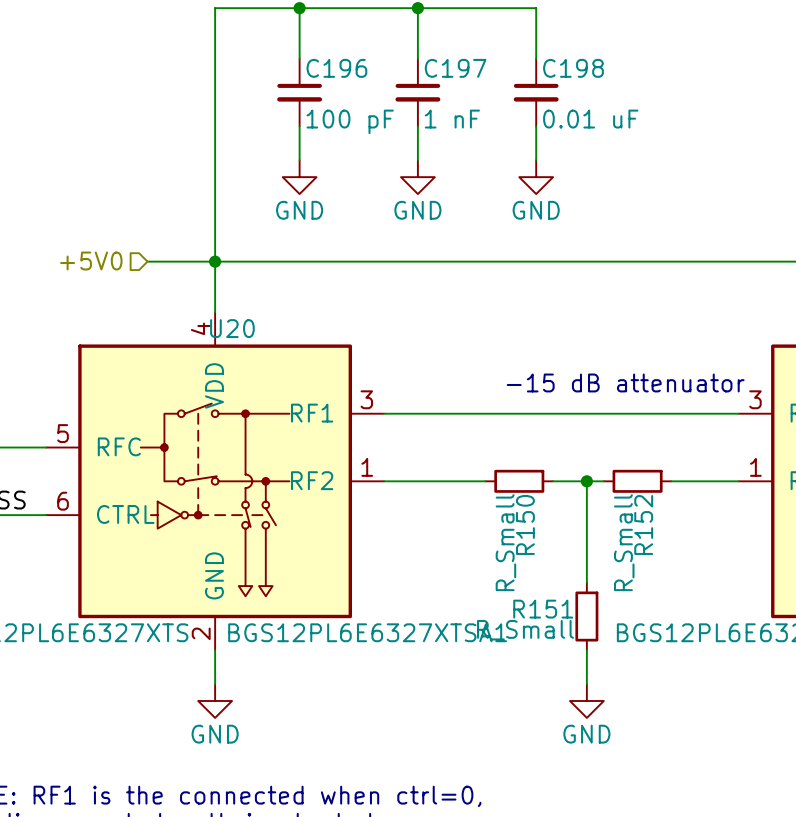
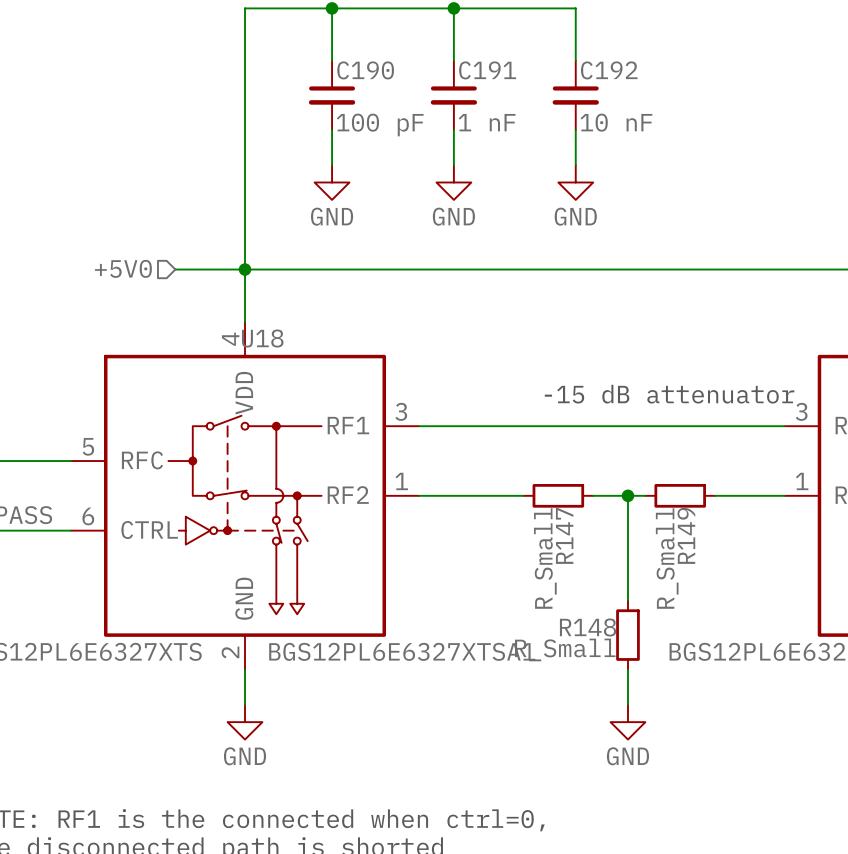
C196 name: C196 (336, 68) -> C190 (365, 70)
C197 name: C197 (455, 68) -> C191 (487, 70)
C198 name: C198 (573, 68) -> C192 (609, 70)
C198 value: 0.01 uF (590, 119) -> 10 nF (616, 122)
U20 name: U20 (232, 328) -> U18 (262, 338)
R150 name: R150 (525, 524) -> R147 (564, 535)
R152 name: R152 (643, 524) -> R149 (686, 535)
R151 name: R151 (543, 609) -> R148 (588, 627)

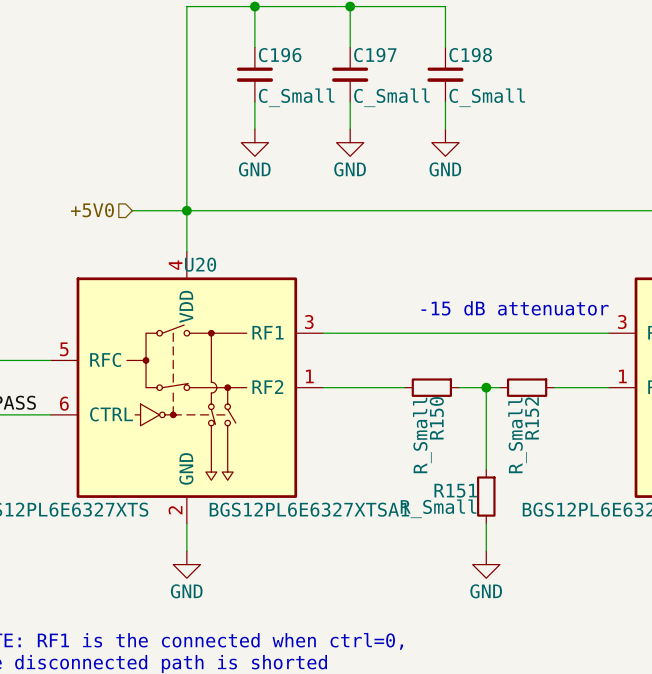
C190 name: C190 (365, 70) -> C196 (280, 55)
C191 name: C191 (487, 70) -> C197 (375, 55)
C192 name: C192 (609, 70) -> C198 (470, 55)
C191 value: 1 nF (487, 122) -> C_Small (391, 97)
C192 value: 10 nF (616, 122) -> C_Small (487, 97)
C190 value: 100 pF (380, 124) -> C_Small (296, 97)
U18 name: U18 (262, 338) -> U20 (200, 264)
R147 name: R147 (564, 535) -> R150 (436, 418)
R149 name: R149 (686, 535) -> R152 (532, 418)
R148 name: R148 (588, 627) -> R151 (455, 490)

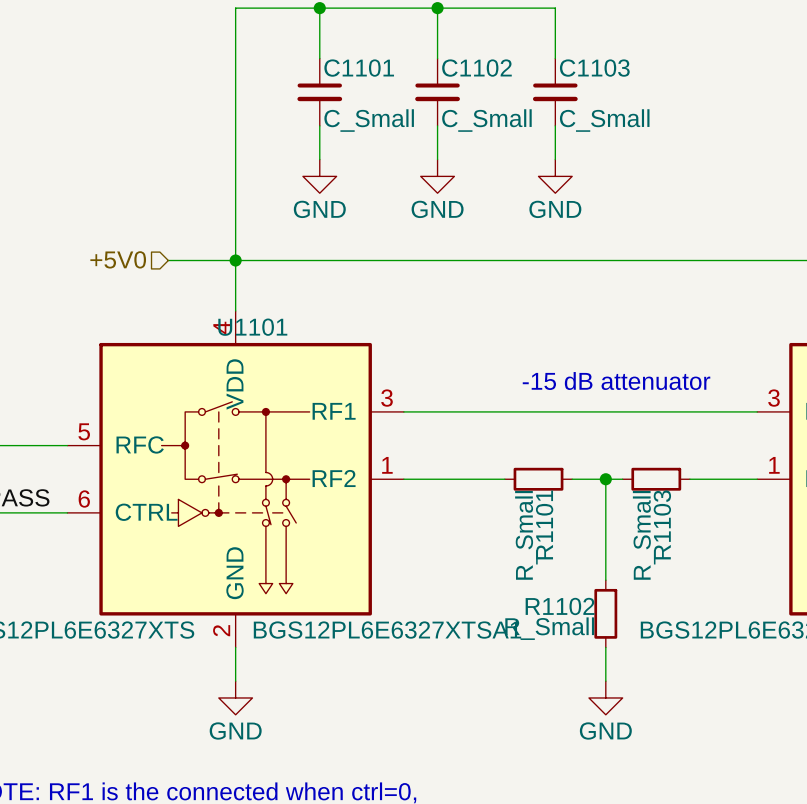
C196 name: C196 (280, 55) -> C1101 (359, 68)
C197 name: C197 (375, 55) -> C1102 (476, 68)
C198 name: C198 (470, 55) -> C1103 (594, 68)
U20 name: U20 (200, 264) -> U1101 (252, 327)
R150 name: R150 (436, 418) -> R1101 (544, 524)
R152 name: R152 (532, 418) -> R1103 (662, 524)
R151 name: R151 (455, 490) -> R1102 (560, 606)

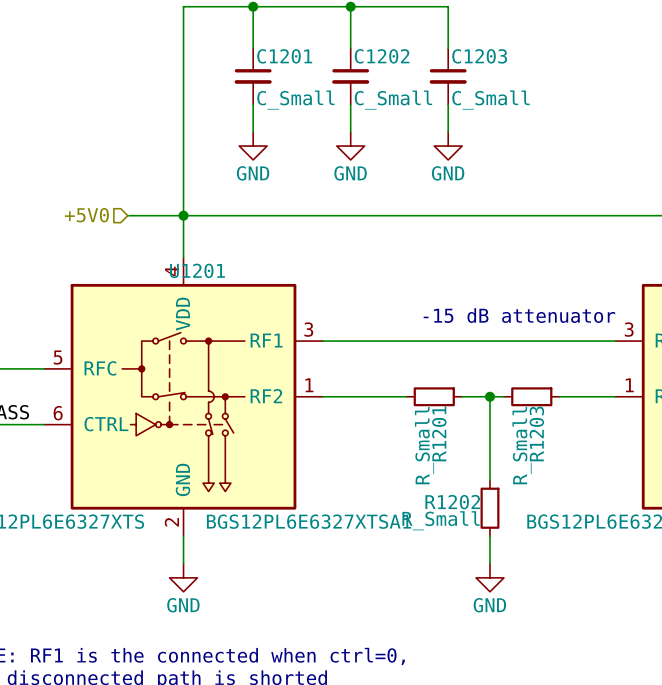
C1101 name: C1101 (359, 68) -> C1201 (284, 56)
C1102 name: C1102 (476, 68) -> C1202 (382, 56)
C1103 name: C1103 (594, 68) -> C1203 (479, 56)
U1101 name: U1101 (252, 327) -> U1201 (197, 270)
R1101 name: R1101 (544, 524) -> R1201 (439, 433)
R1103 name: R1103 (662, 524) -> R1203 (536, 433)
R1102 name: R1102 (560, 606) -> R1202 (452, 502)

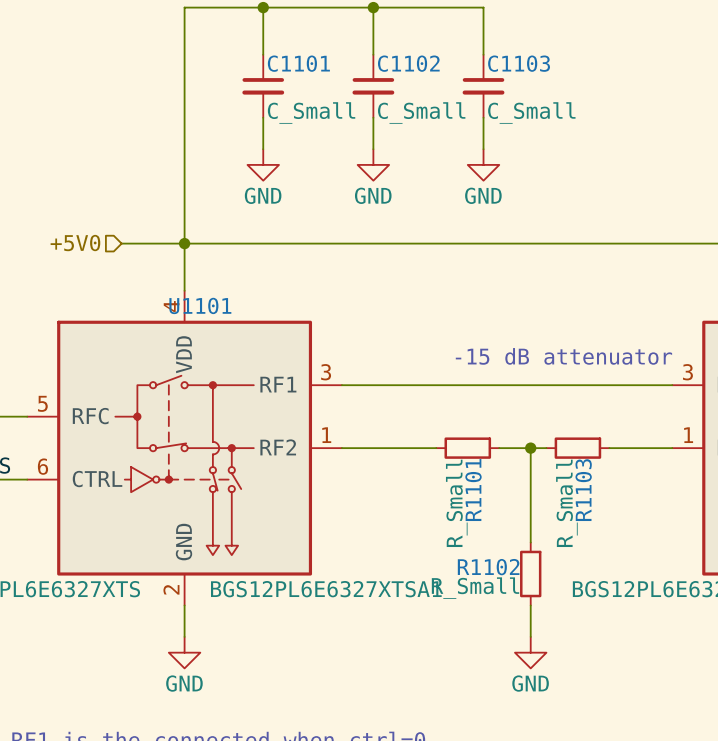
C1201 name: C1201 (284, 56) -> C1101 (298, 63)
C1202 name: C1202 (382, 56) -> C1102 (408, 63)
C1203 name: C1203 (479, 56) -> C1103 (519, 63)
U1201 name: U1201 (197, 270) -> U1101 (200, 305)
R1201 name: R1201 (439, 433) -> R1101 (473, 490)
R1203 name: R1203 (536, 433) -> R1103 (583, 490)
R1202 name: R1202 (452, 502) -> R1102 (488, 567)

